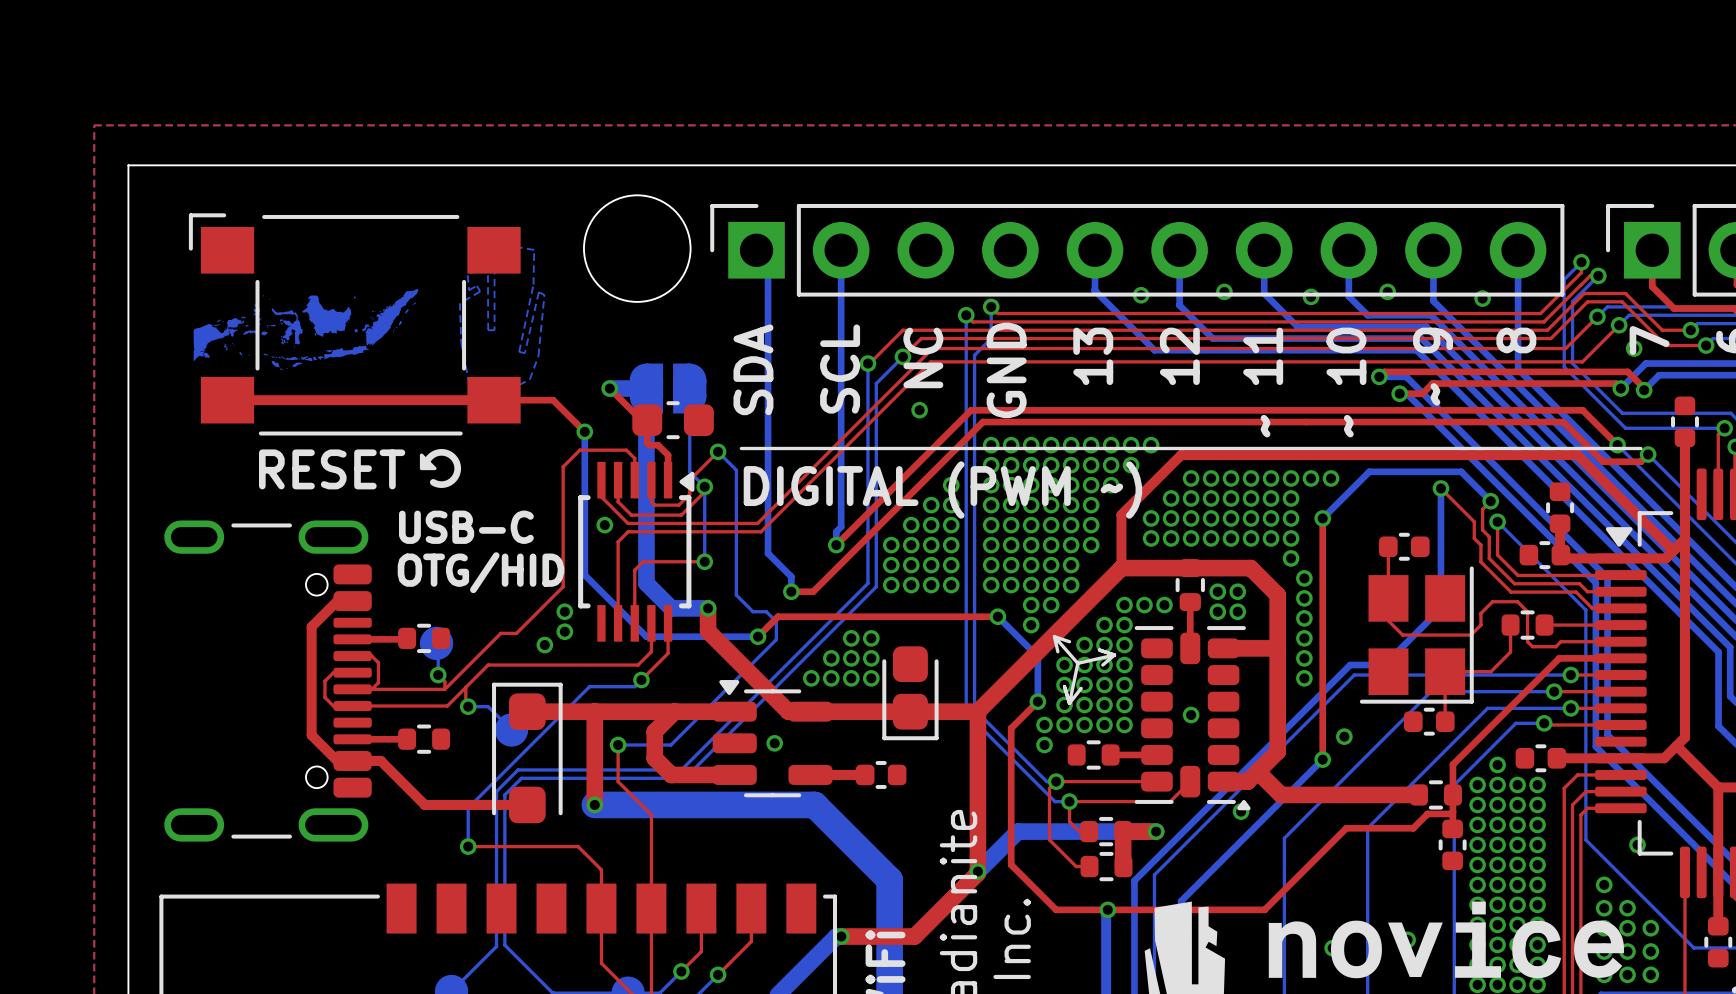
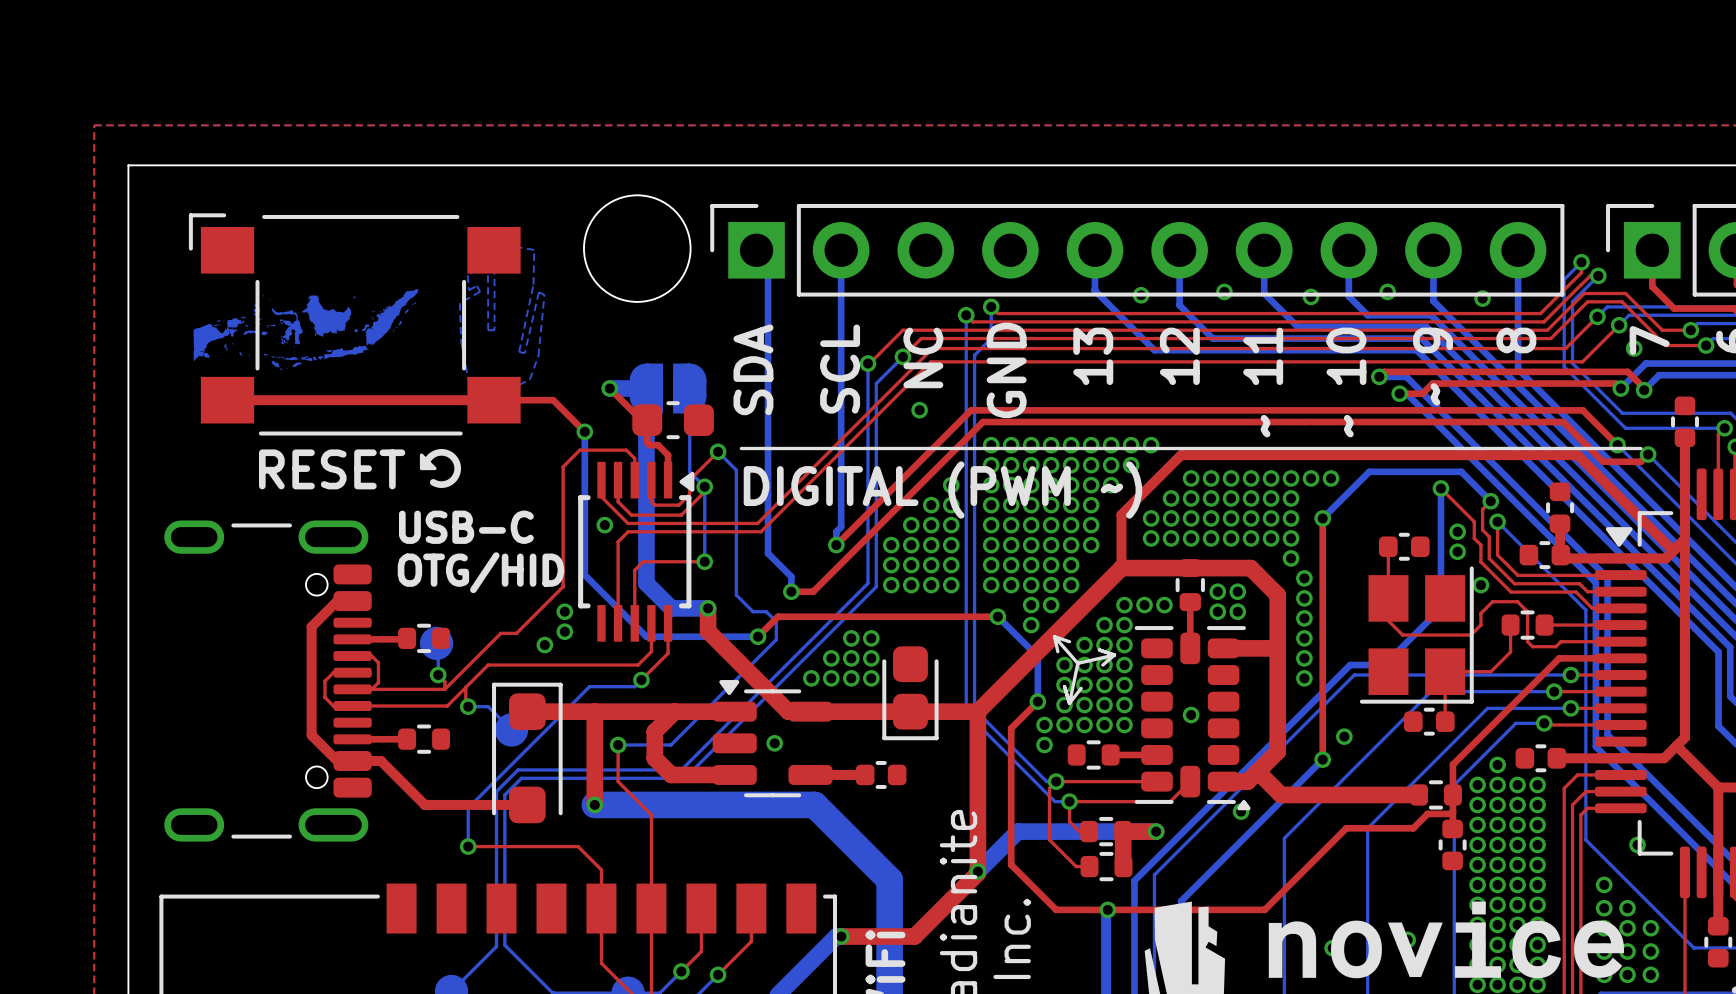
via: none -> (1457, 531)
via: none -> (1457, 551)
via: none -> (1480, 585)

